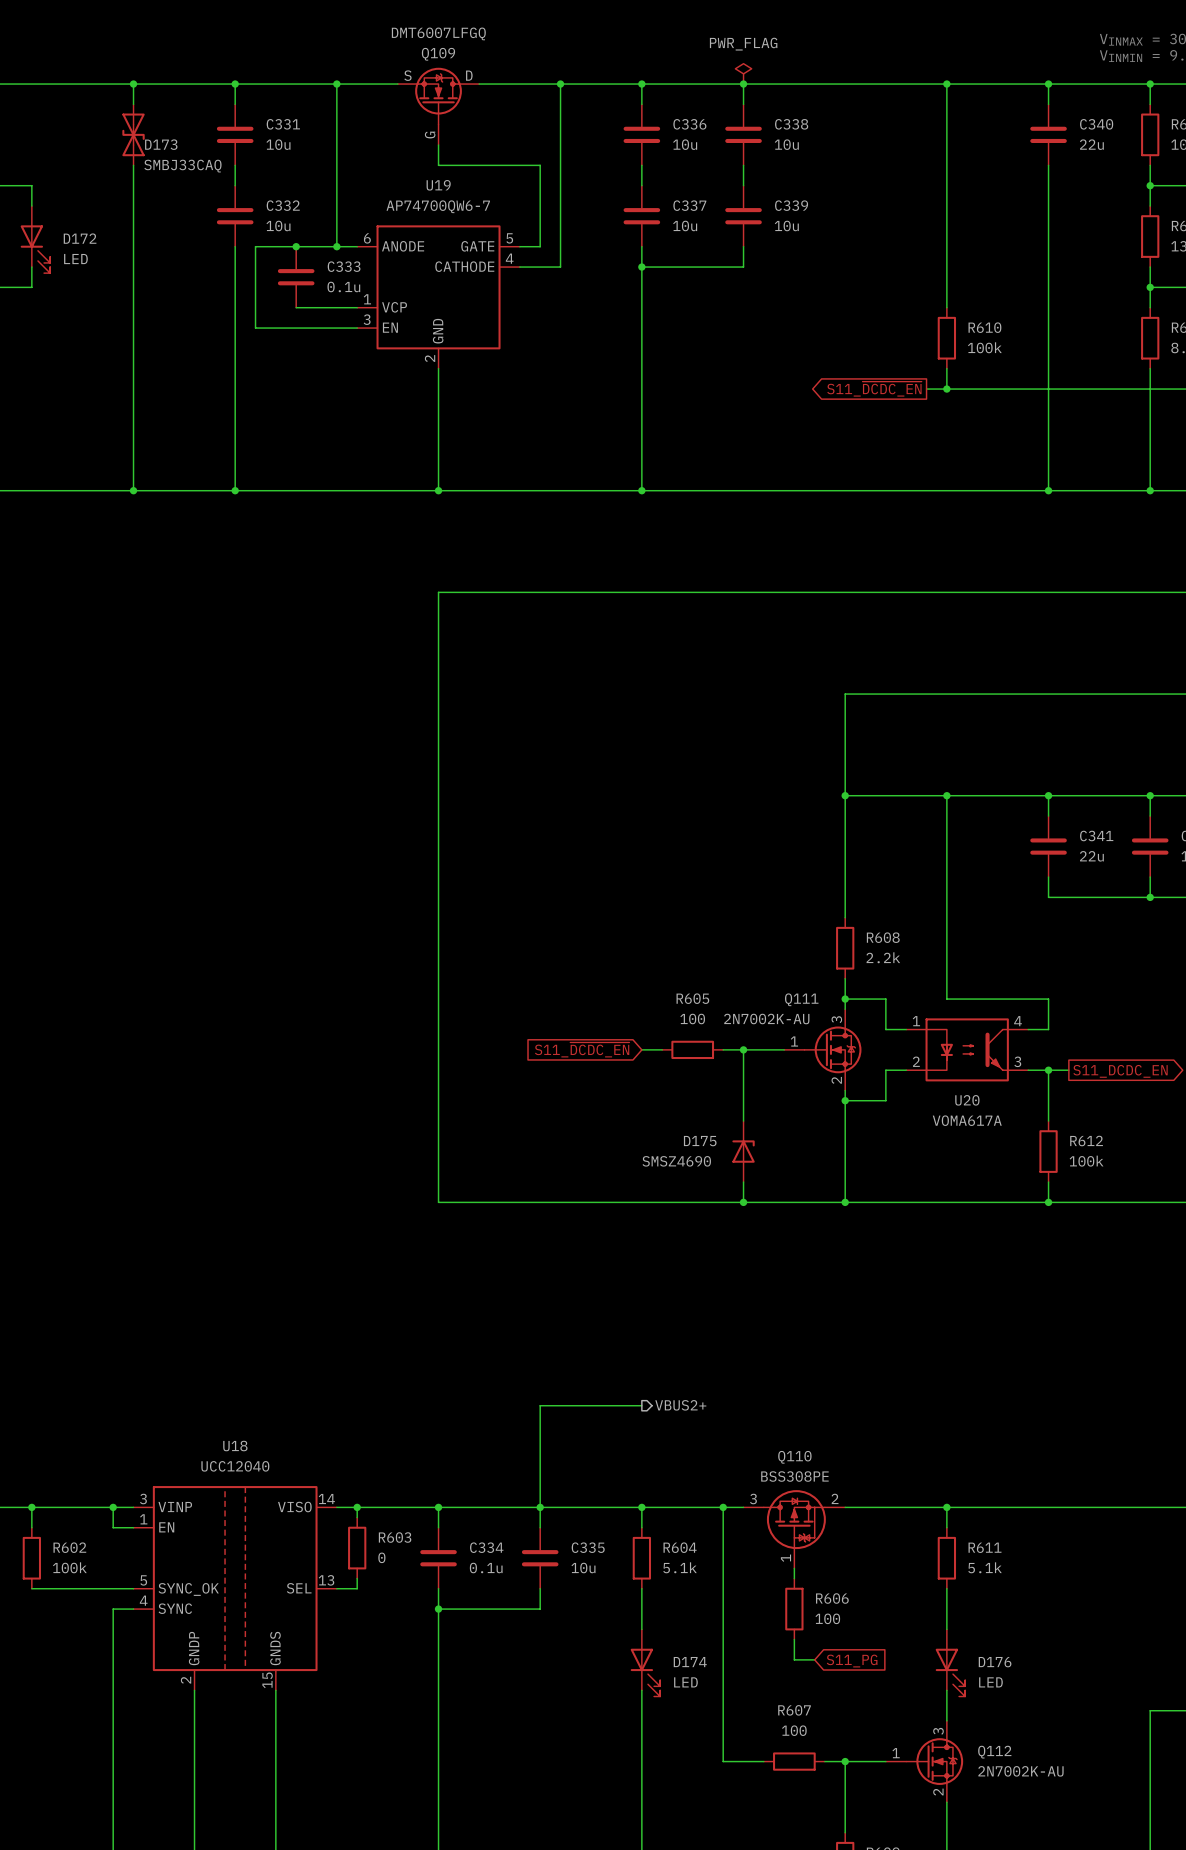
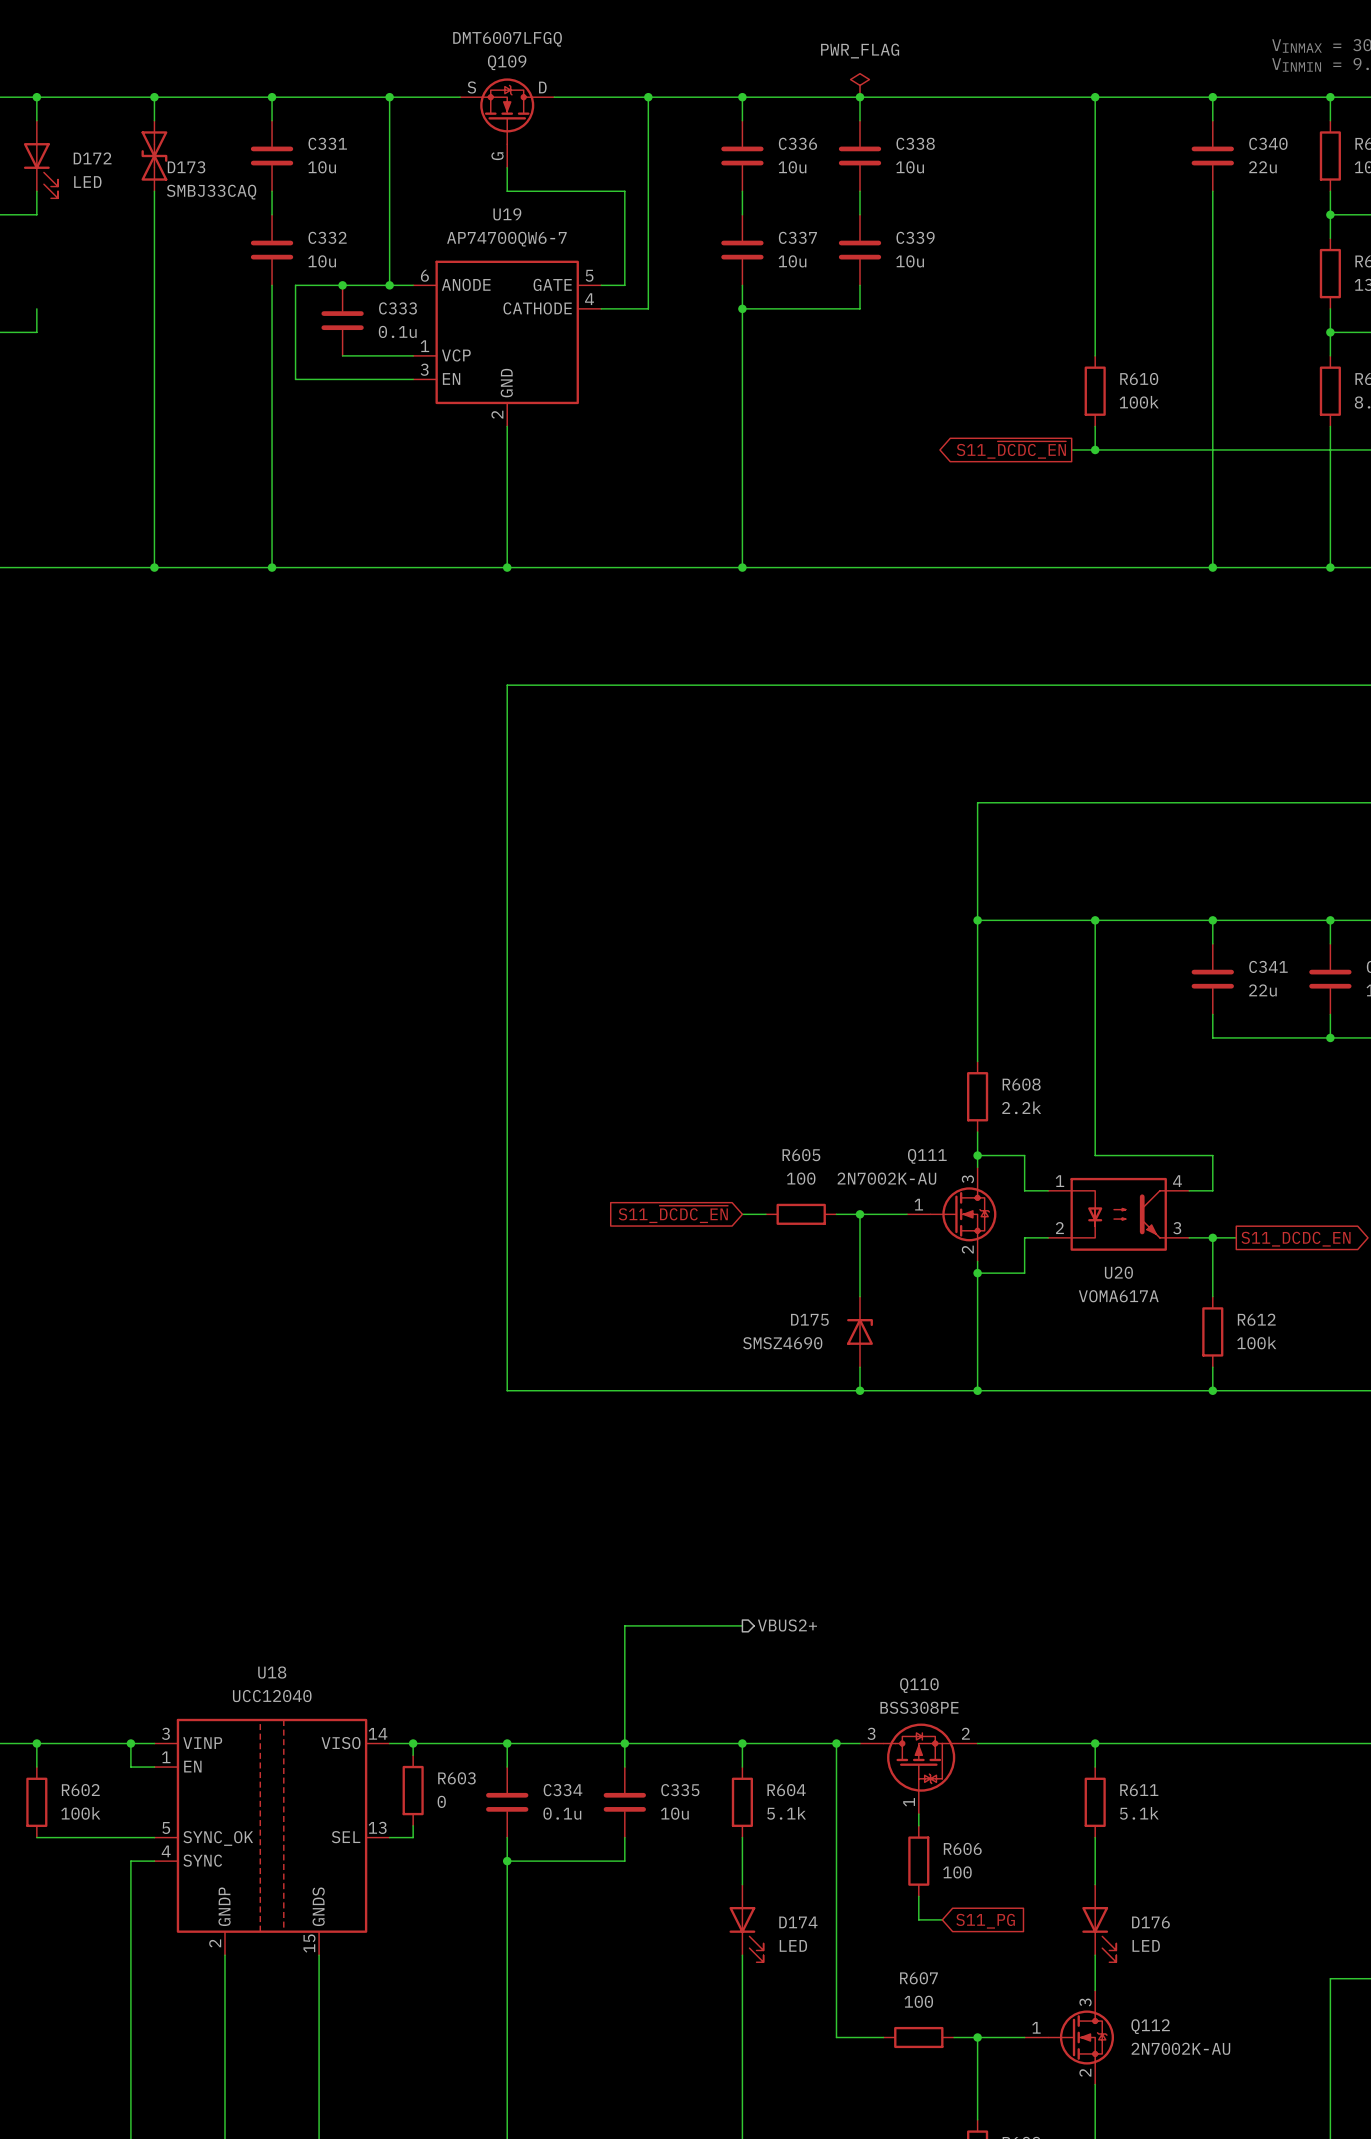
wire: none -> (36, 97) (36, 120)
junction: none -> (36, 97)
wire: (31, 185) (31, 206) -> (36, 214) (36, 191)
D172 position: (35, 239) -> (40, 159)

